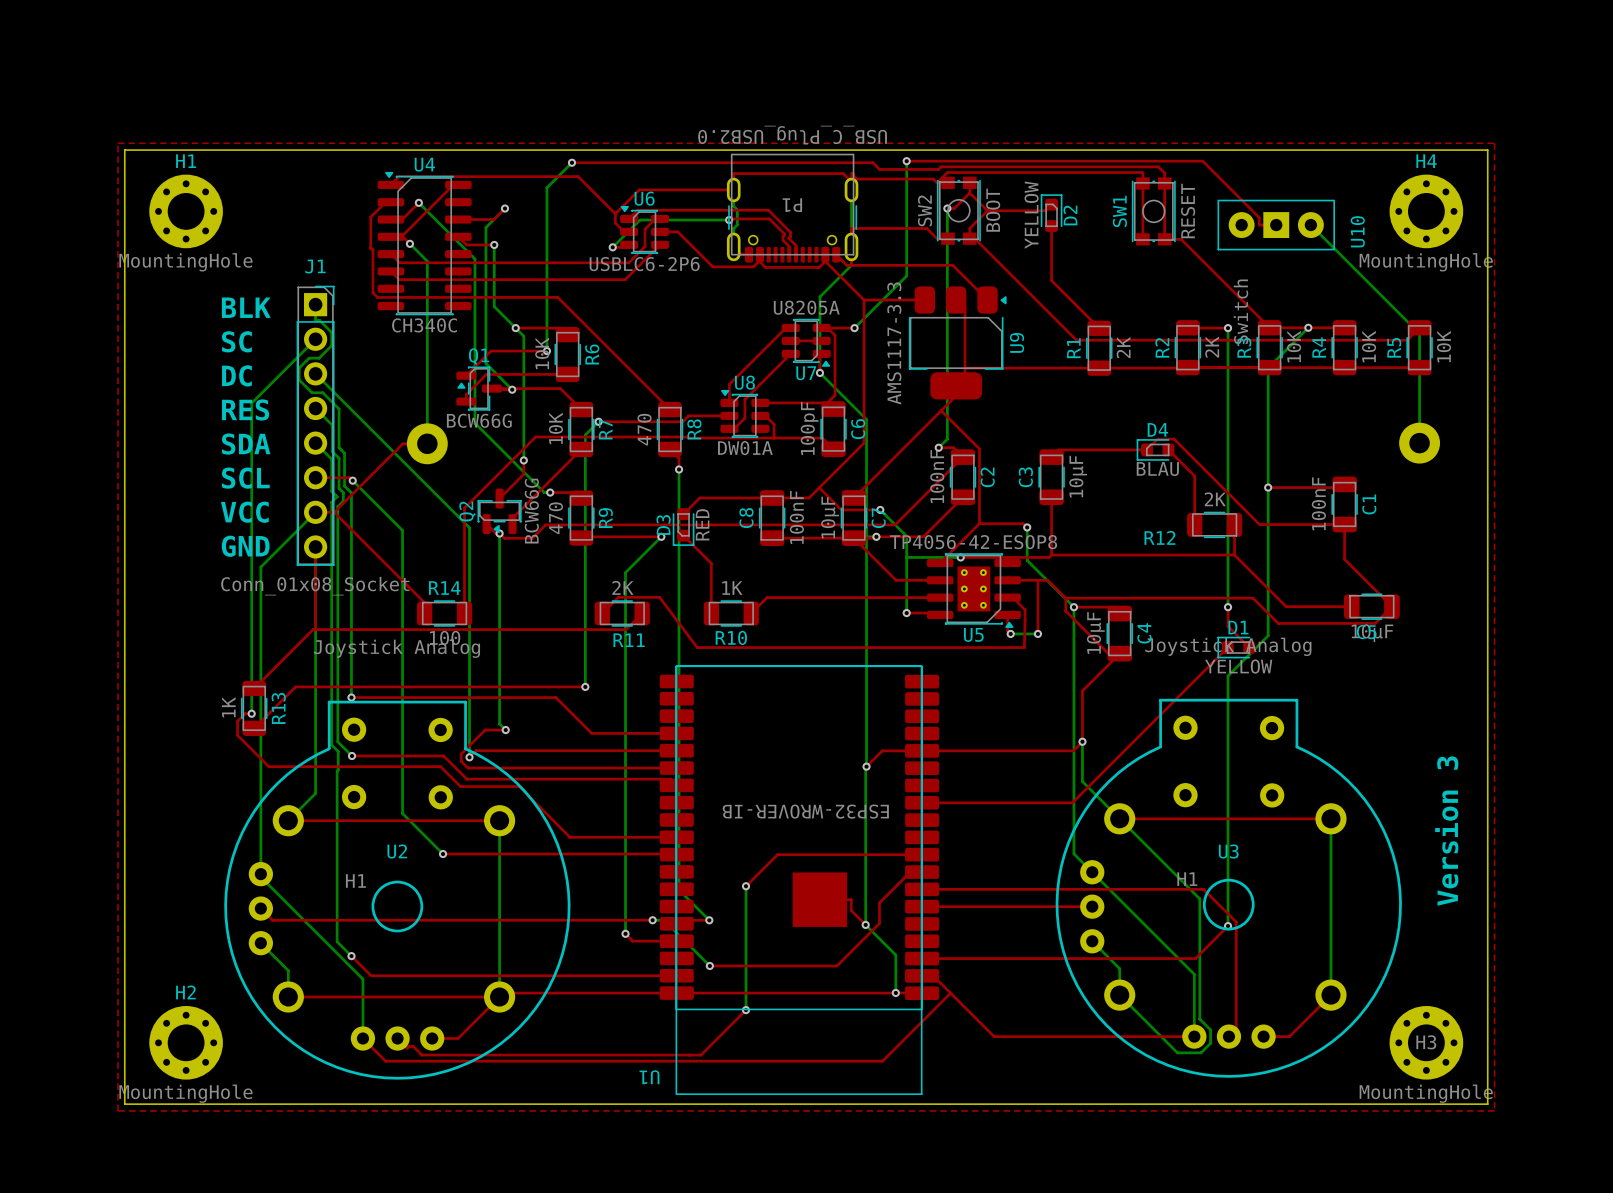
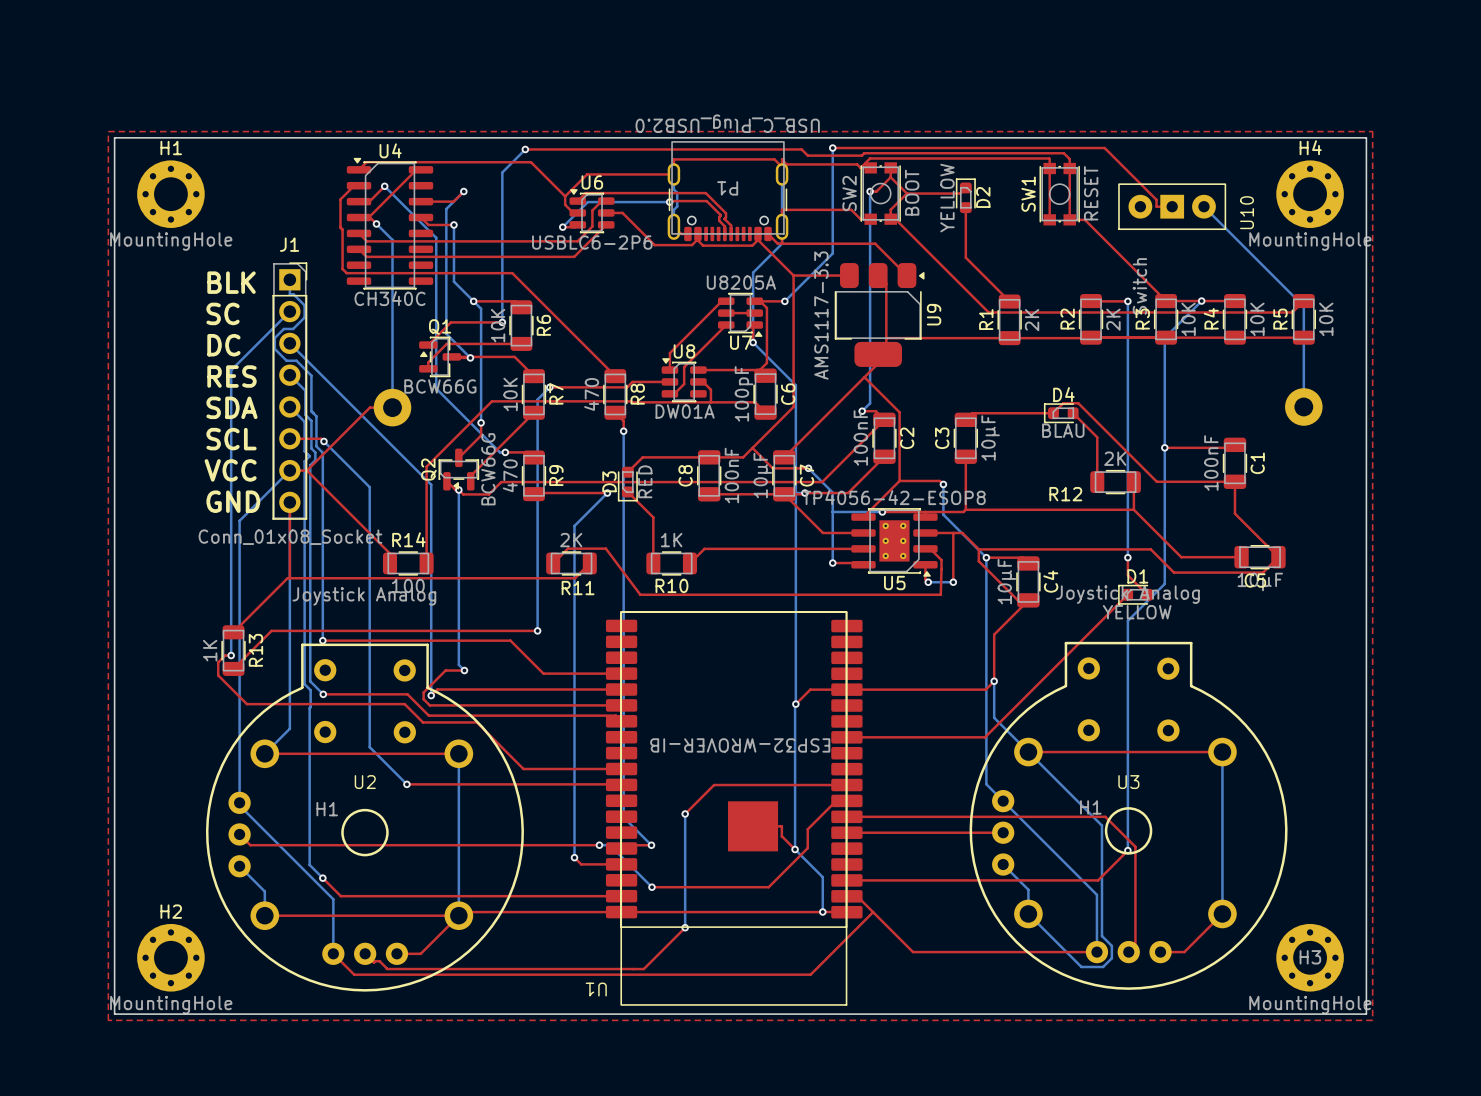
text: Version 3 (1446, 831) -> none

